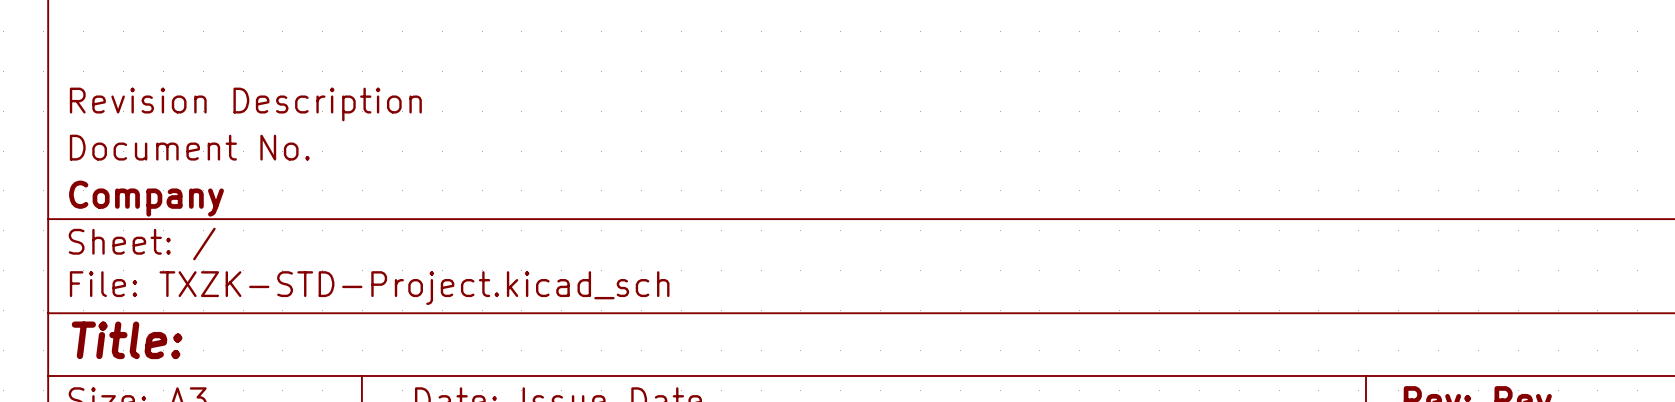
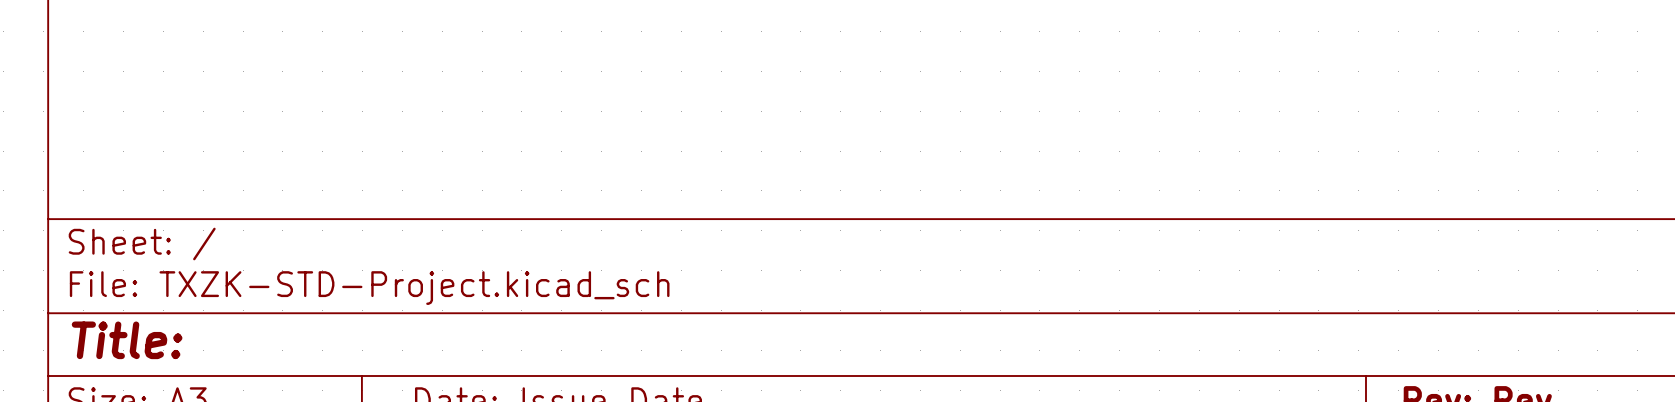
title block: Revision Description (245, 104) -> none
title block: Document No. (189, 147) -> none
title block: Company (146, 198) -> none

